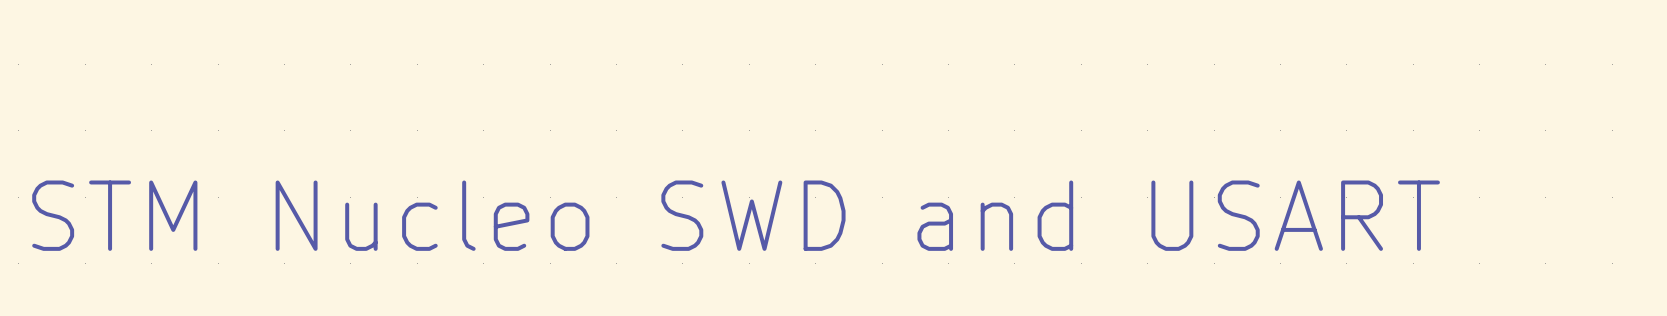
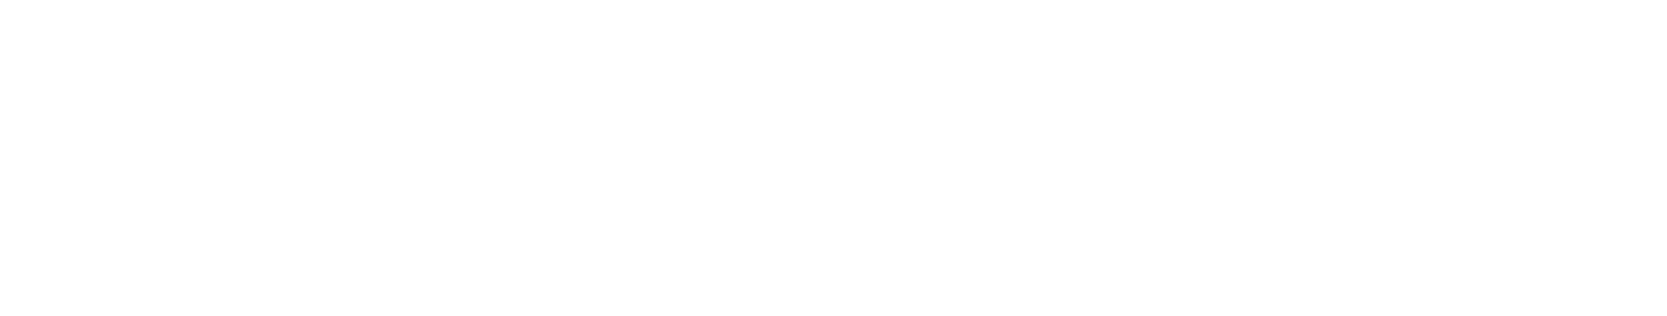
text: STM Nucleo SWD and USART (736, 215) -> none

